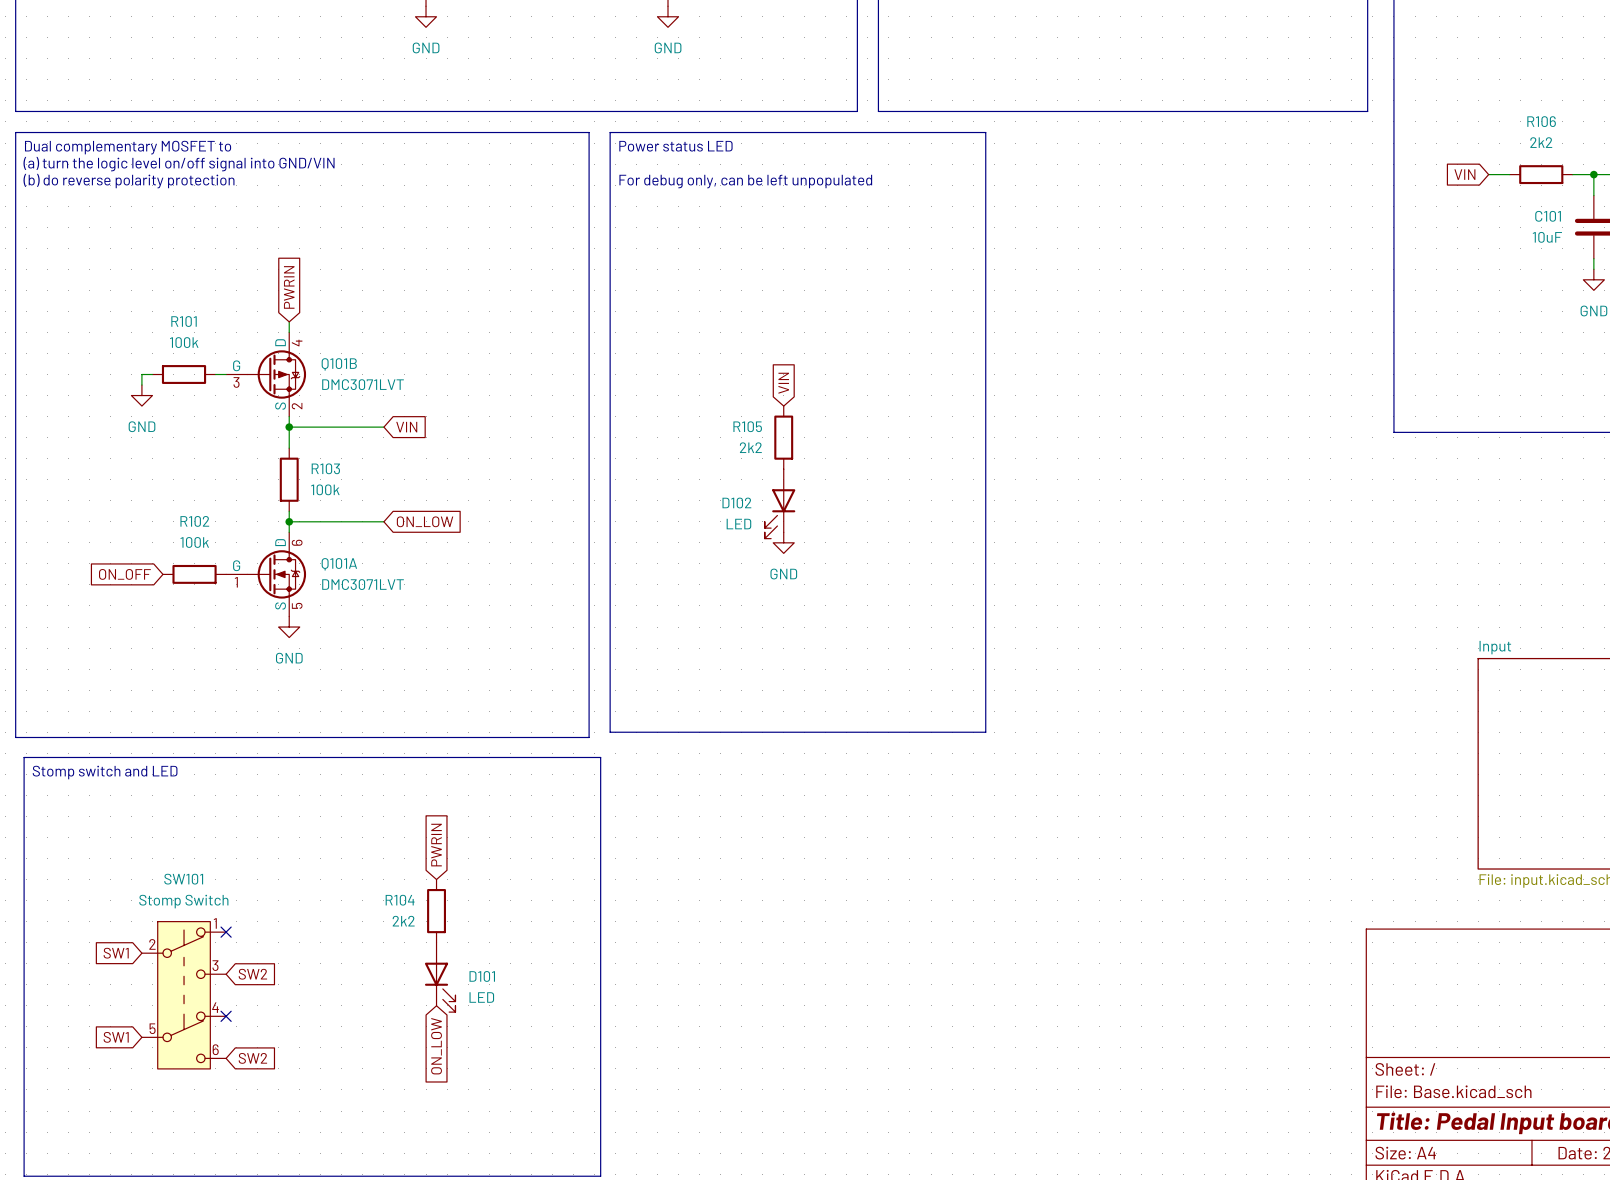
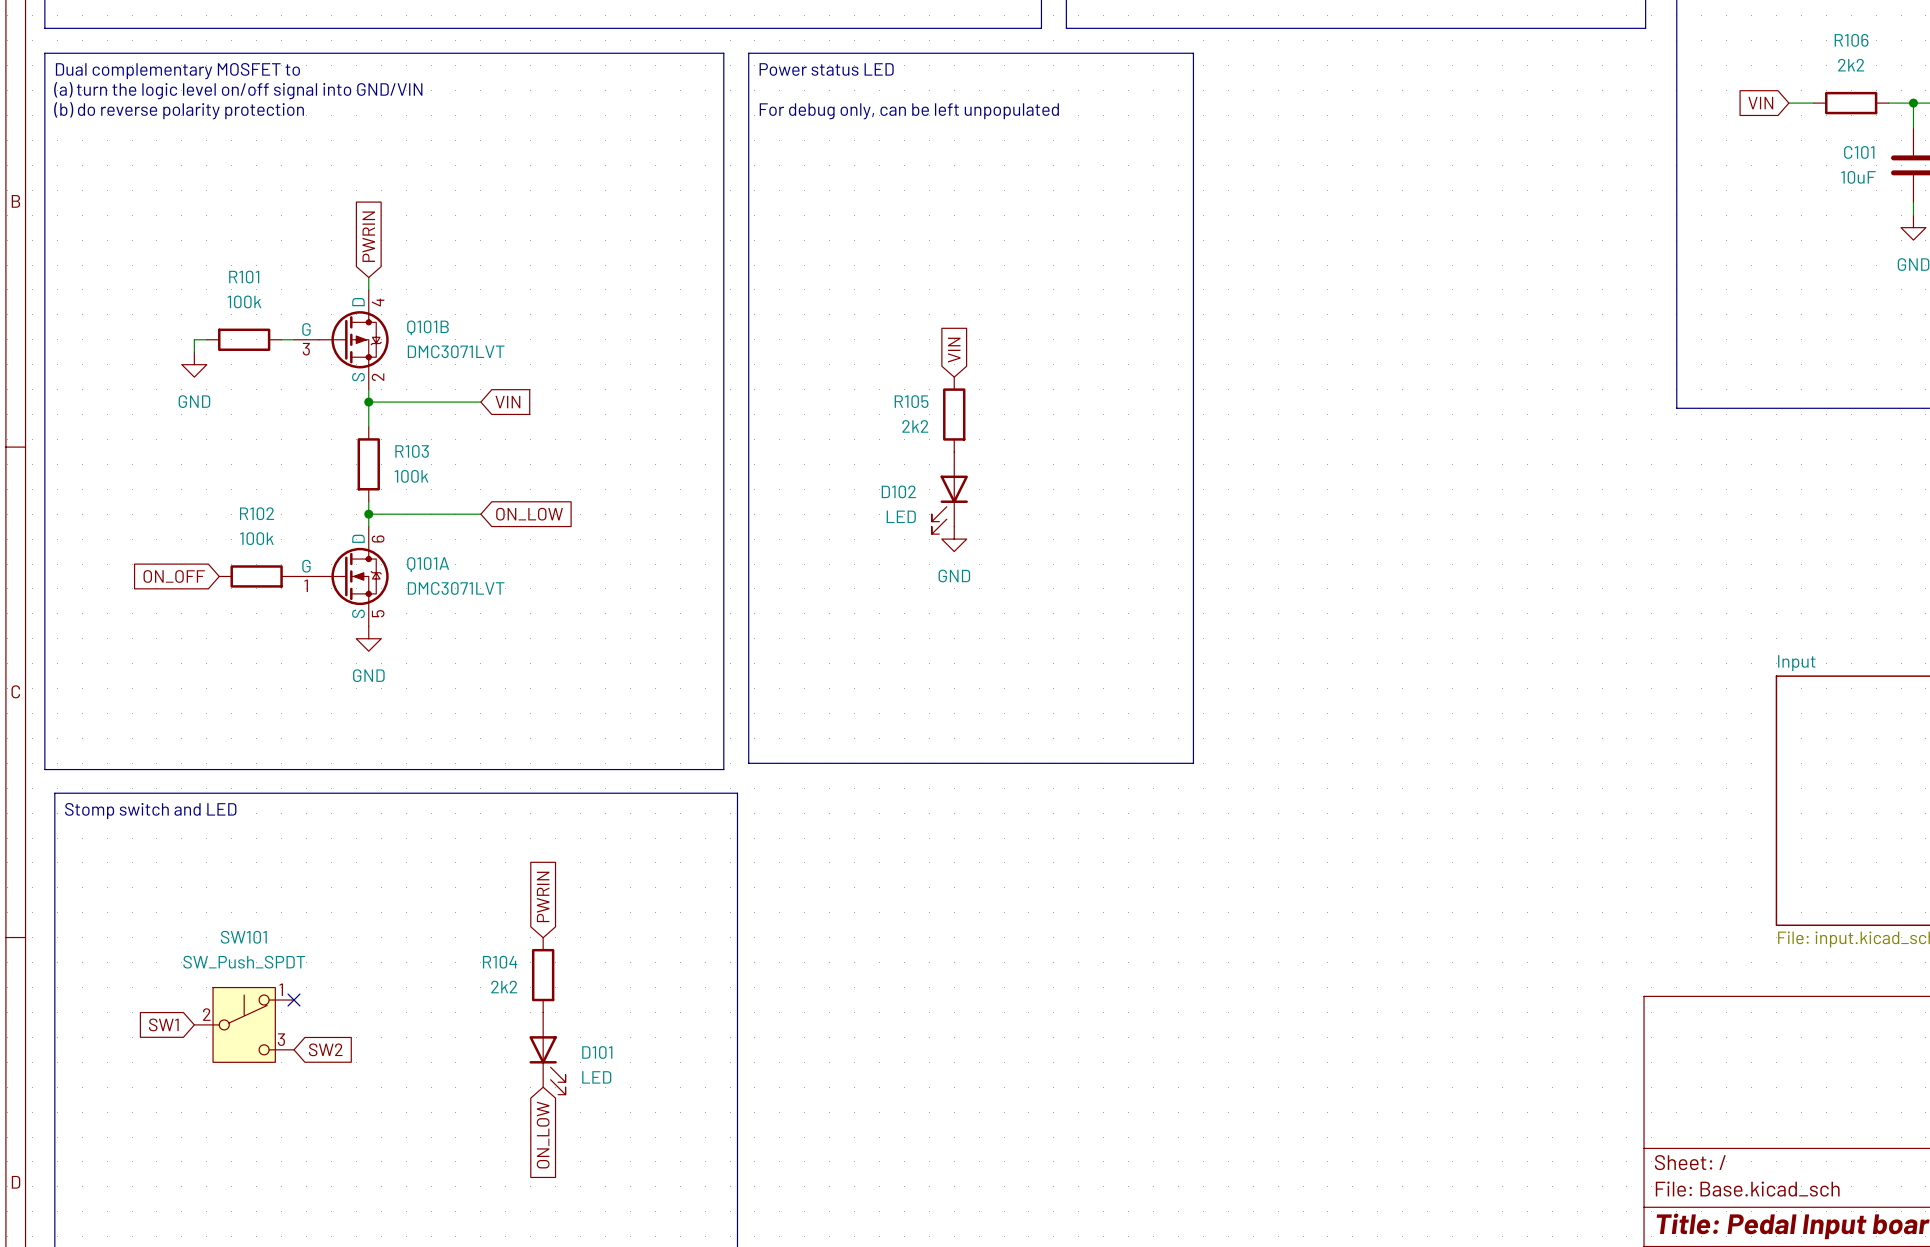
SW101 value: Stomp Switch (183, 901) -> SW_Push_SPDT (244, 962)
SW101 symbol: [141, 921, 227, 1069] -> [194, 987, 295, 1063]
no-connect mark: (226, 1016) -> none
global label: SW1 (116, 1037) -> none
global label: SW2 (252, 1058) -> none

